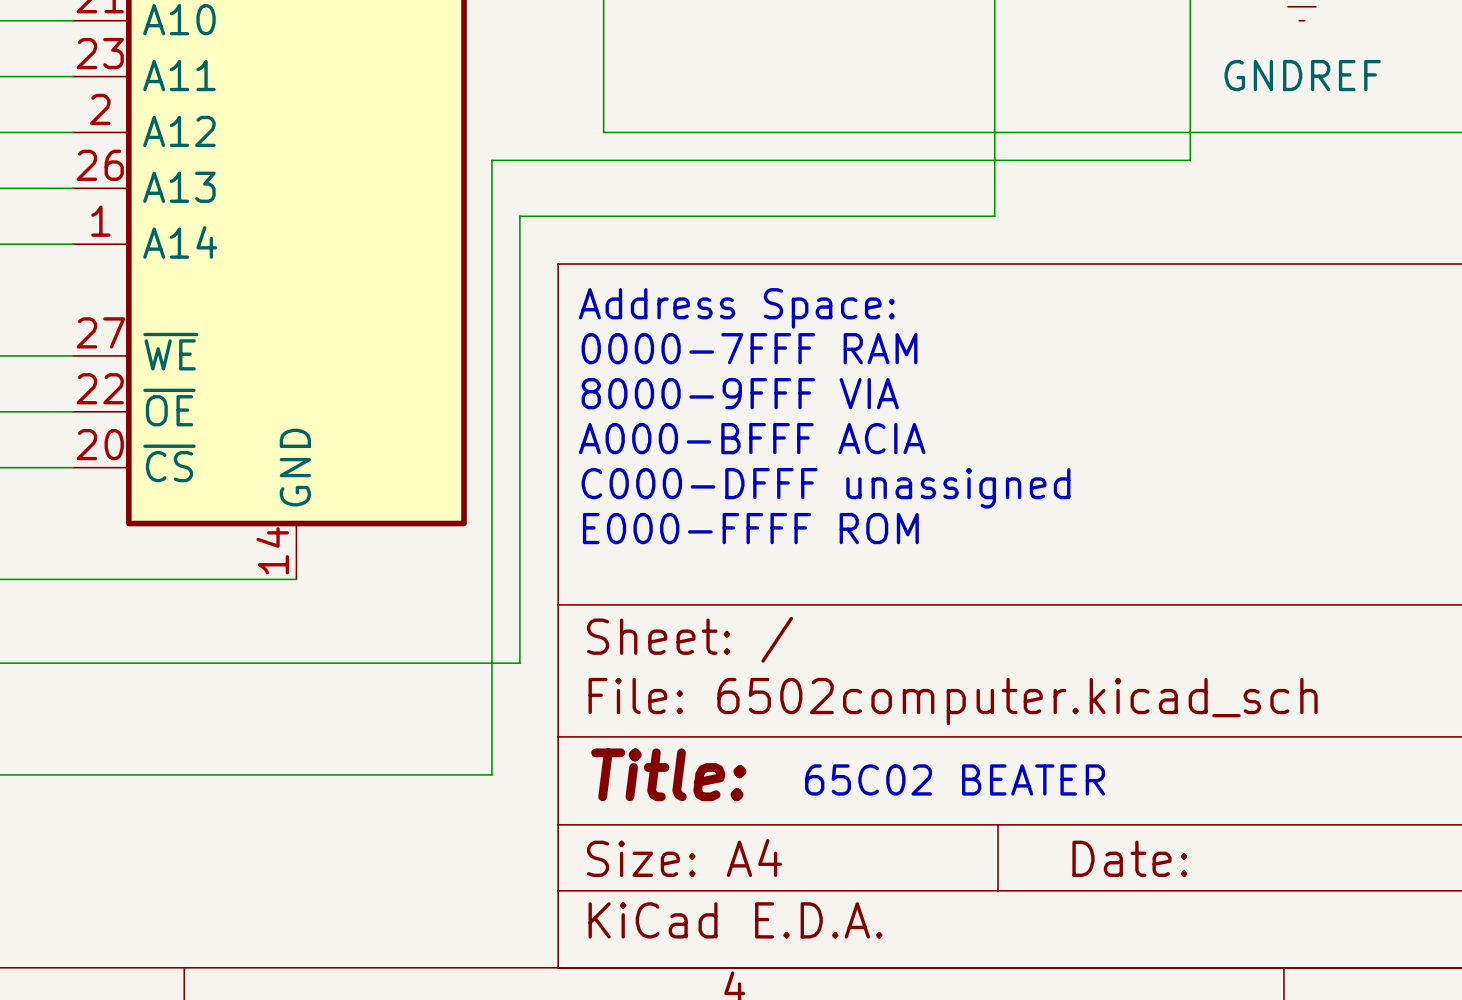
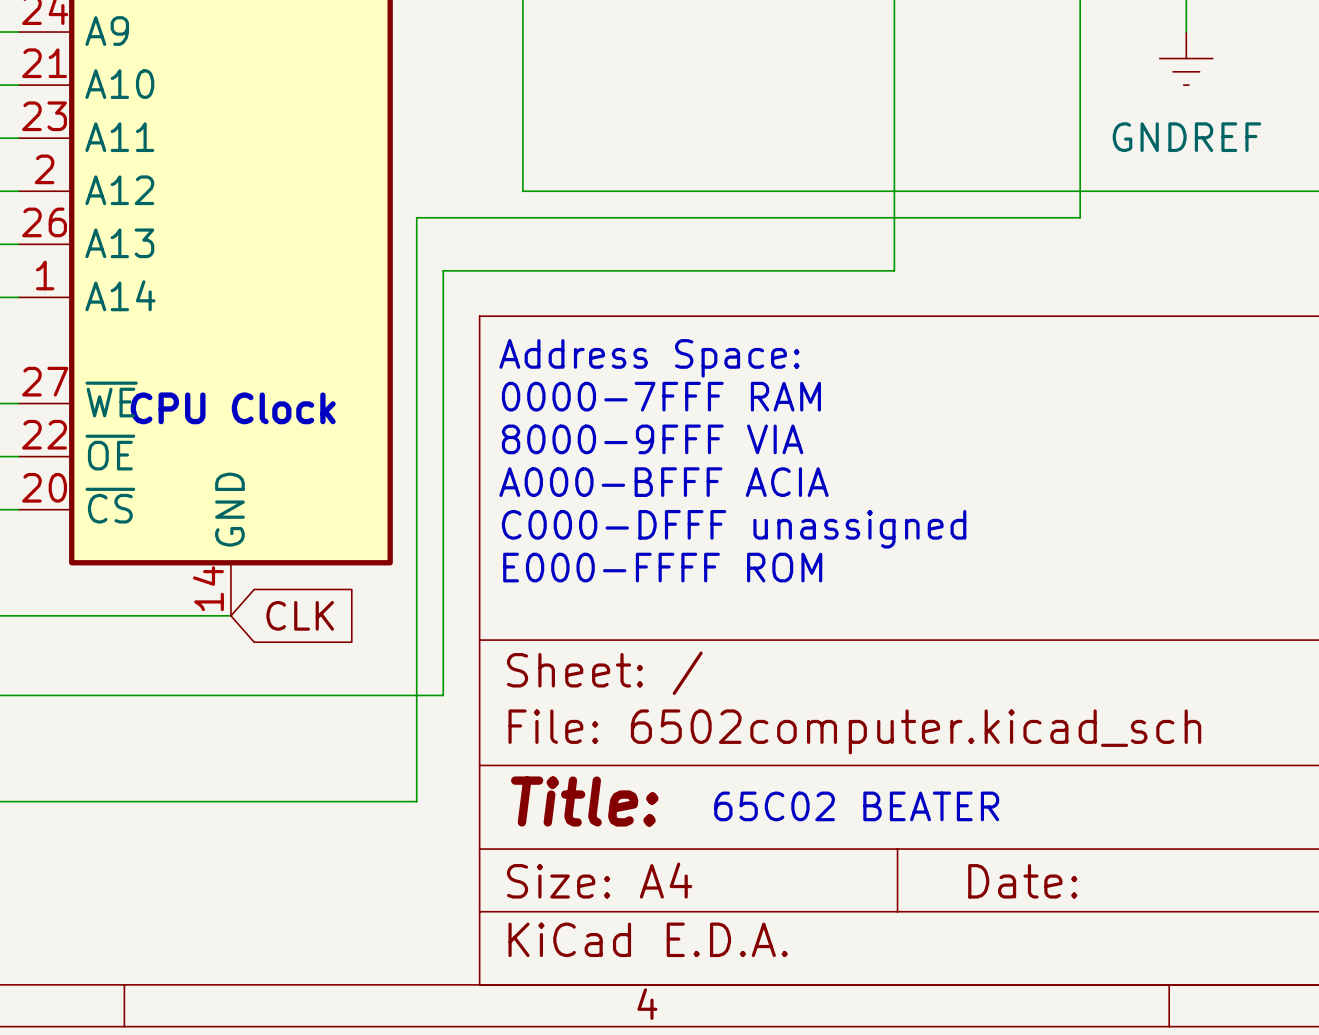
text: none -> CPU Clock (233, 408)
global label: none -> CLK (300, 615)

